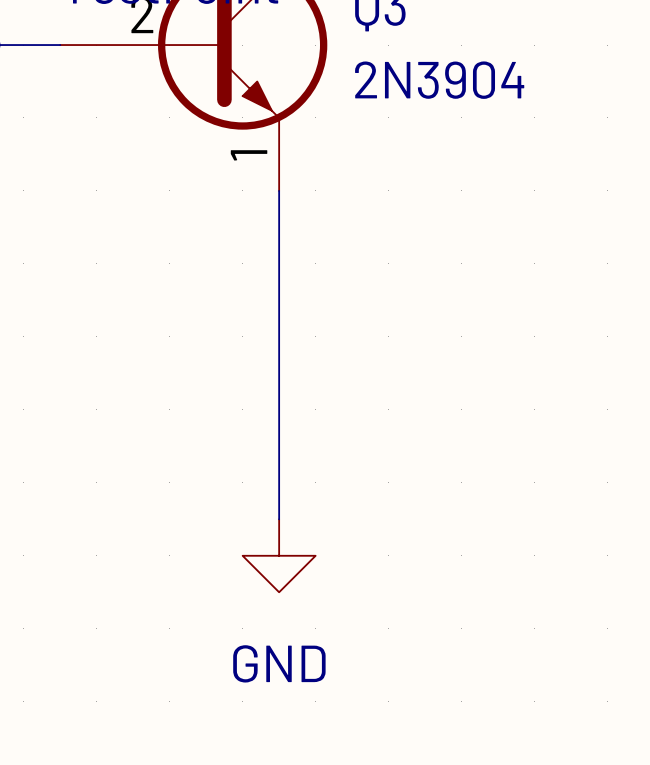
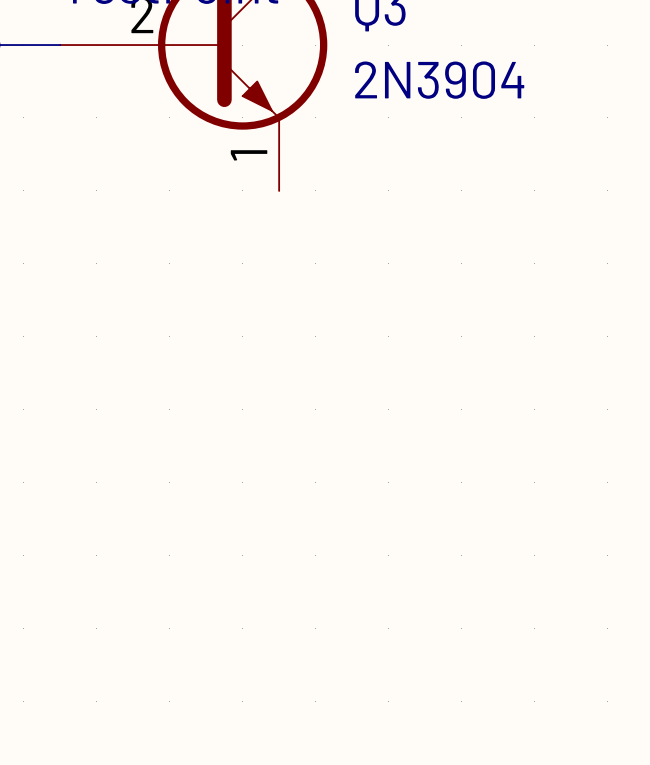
wire: (279, 190) (279, 519) -> none
power symbol: GND (279, 555) -> none

